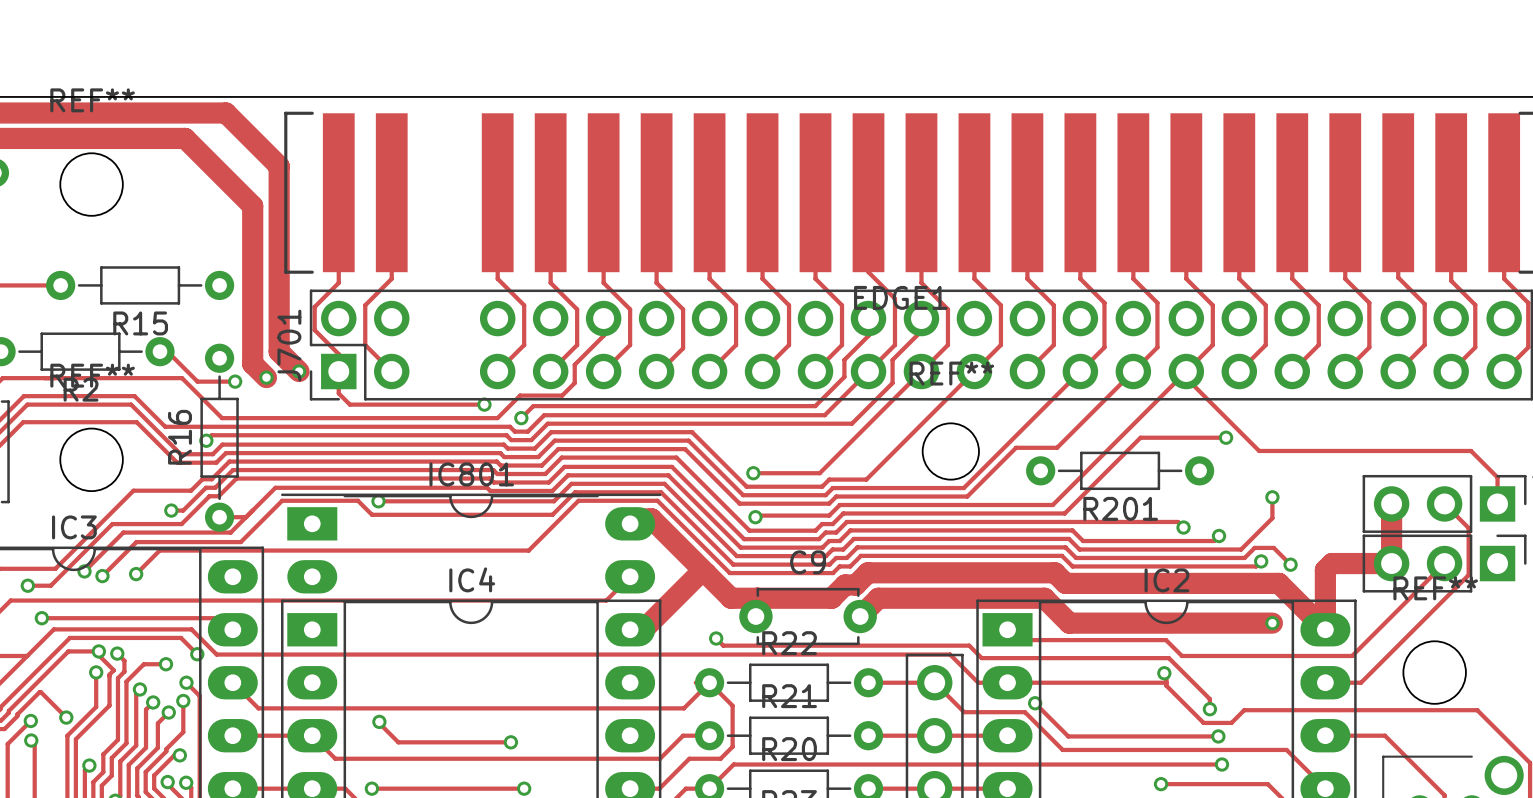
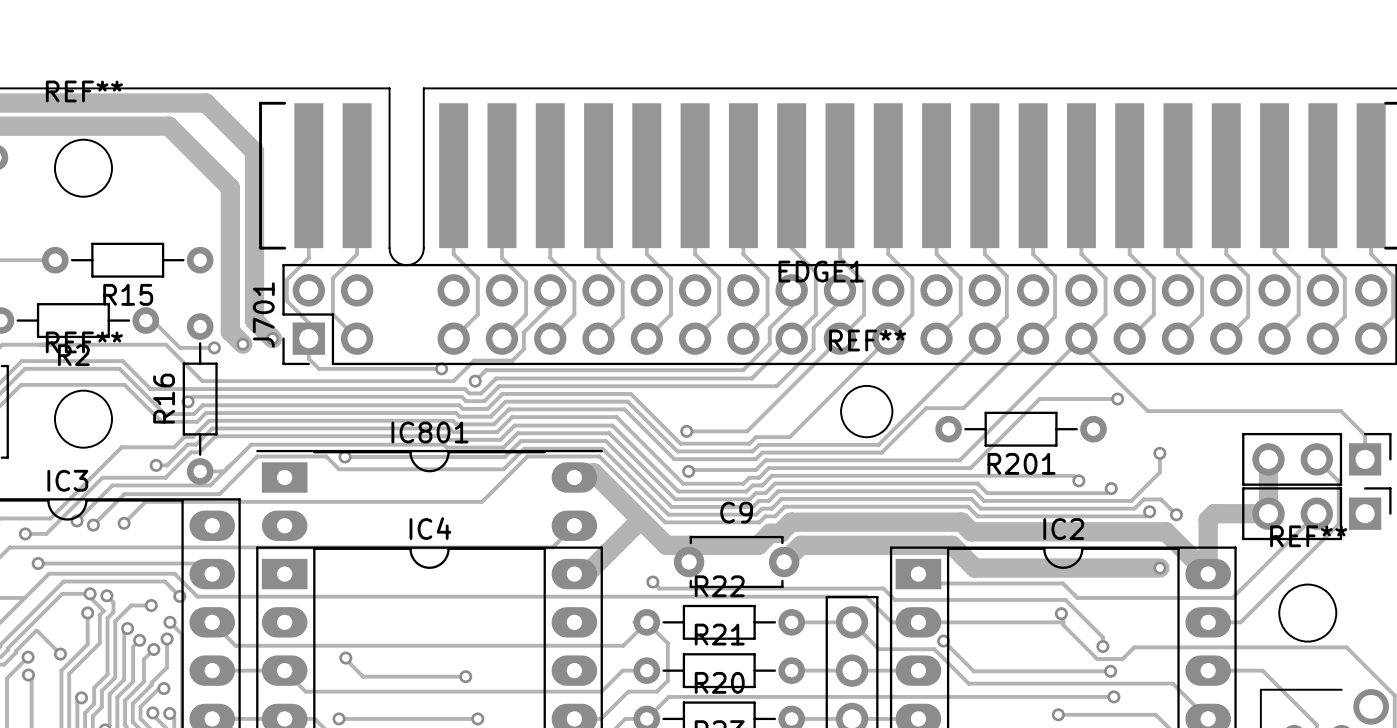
board edge: (427, 96) (464, 96) -> (389, 88) (389, 250) (396, 261) (406, 265) (417, 261) (423, 250) (423, 88)

